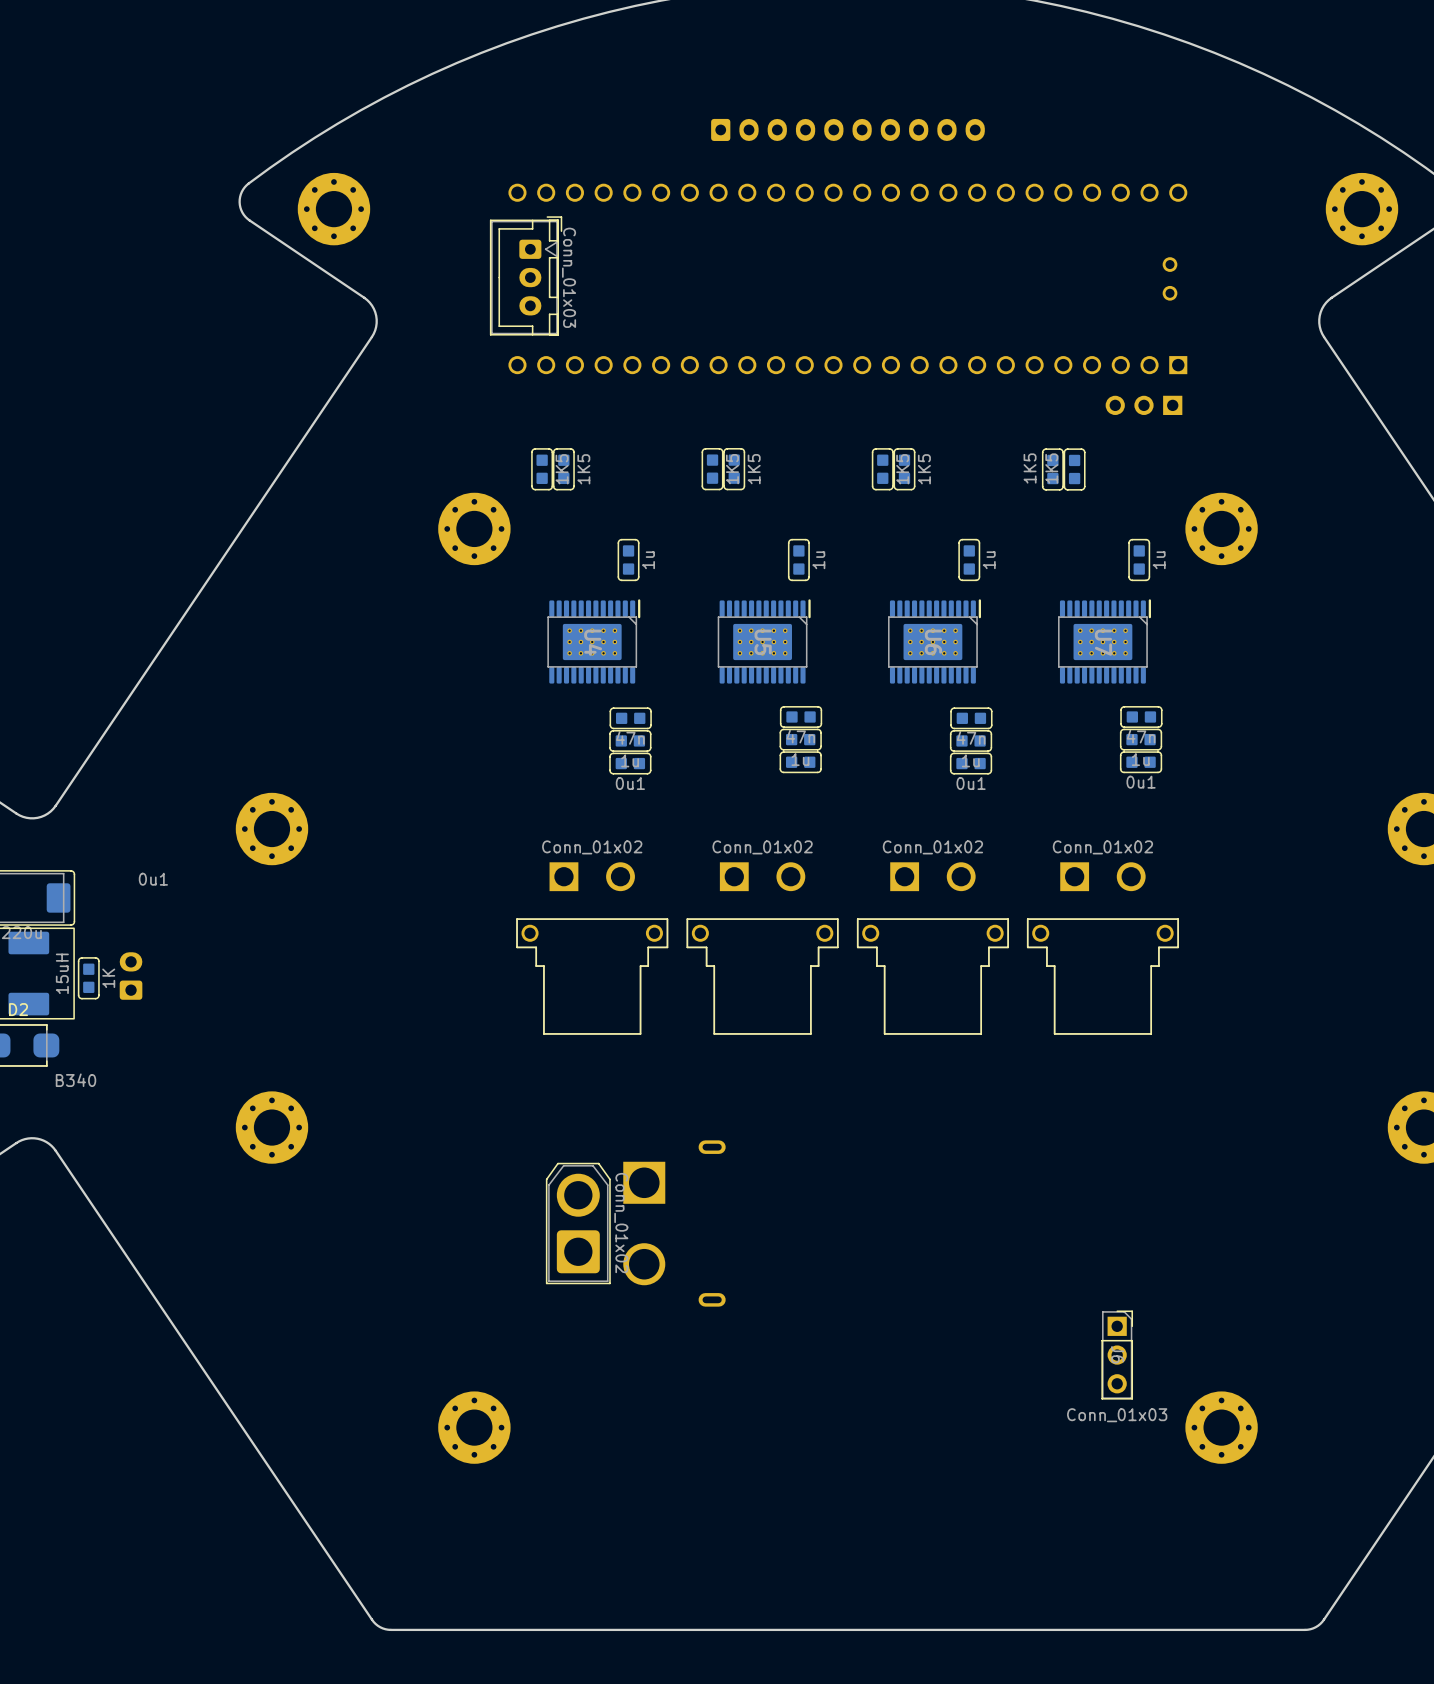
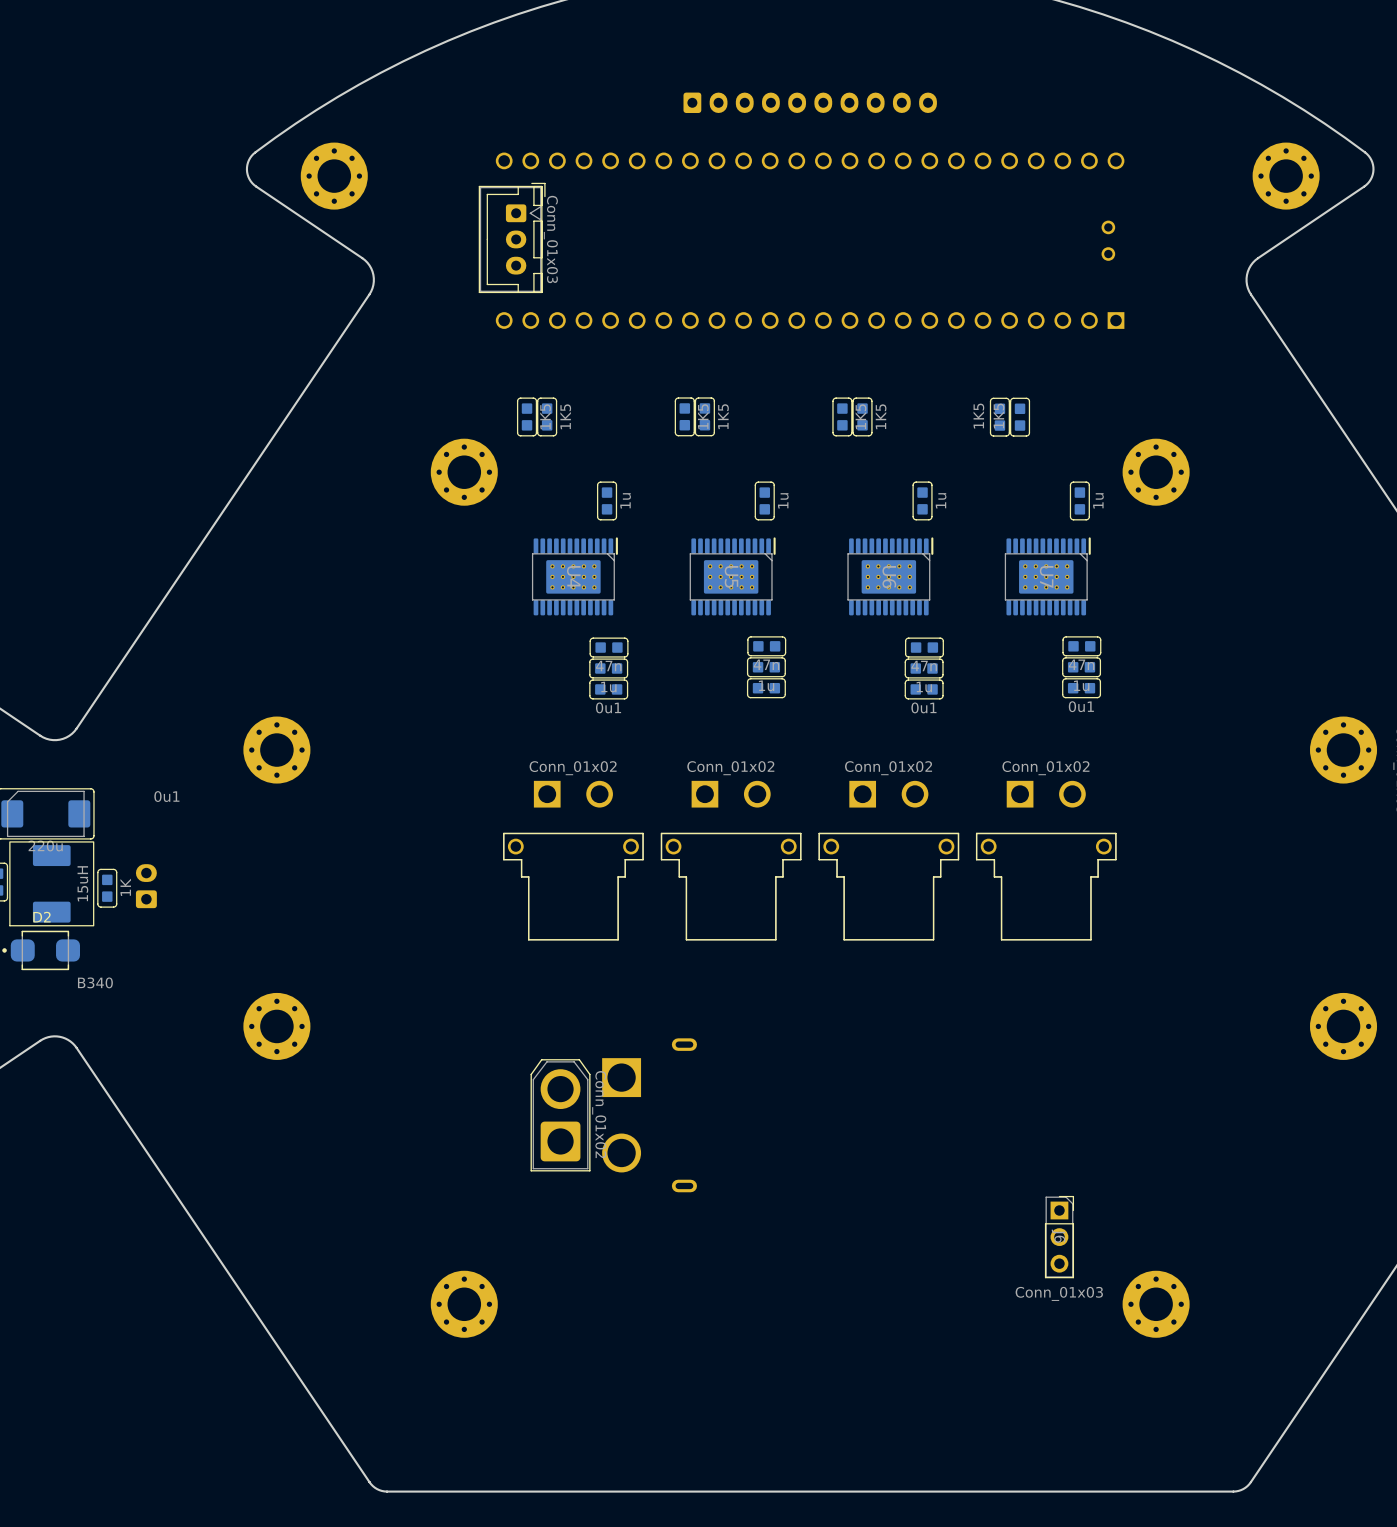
part: (1143, 405) -> none

